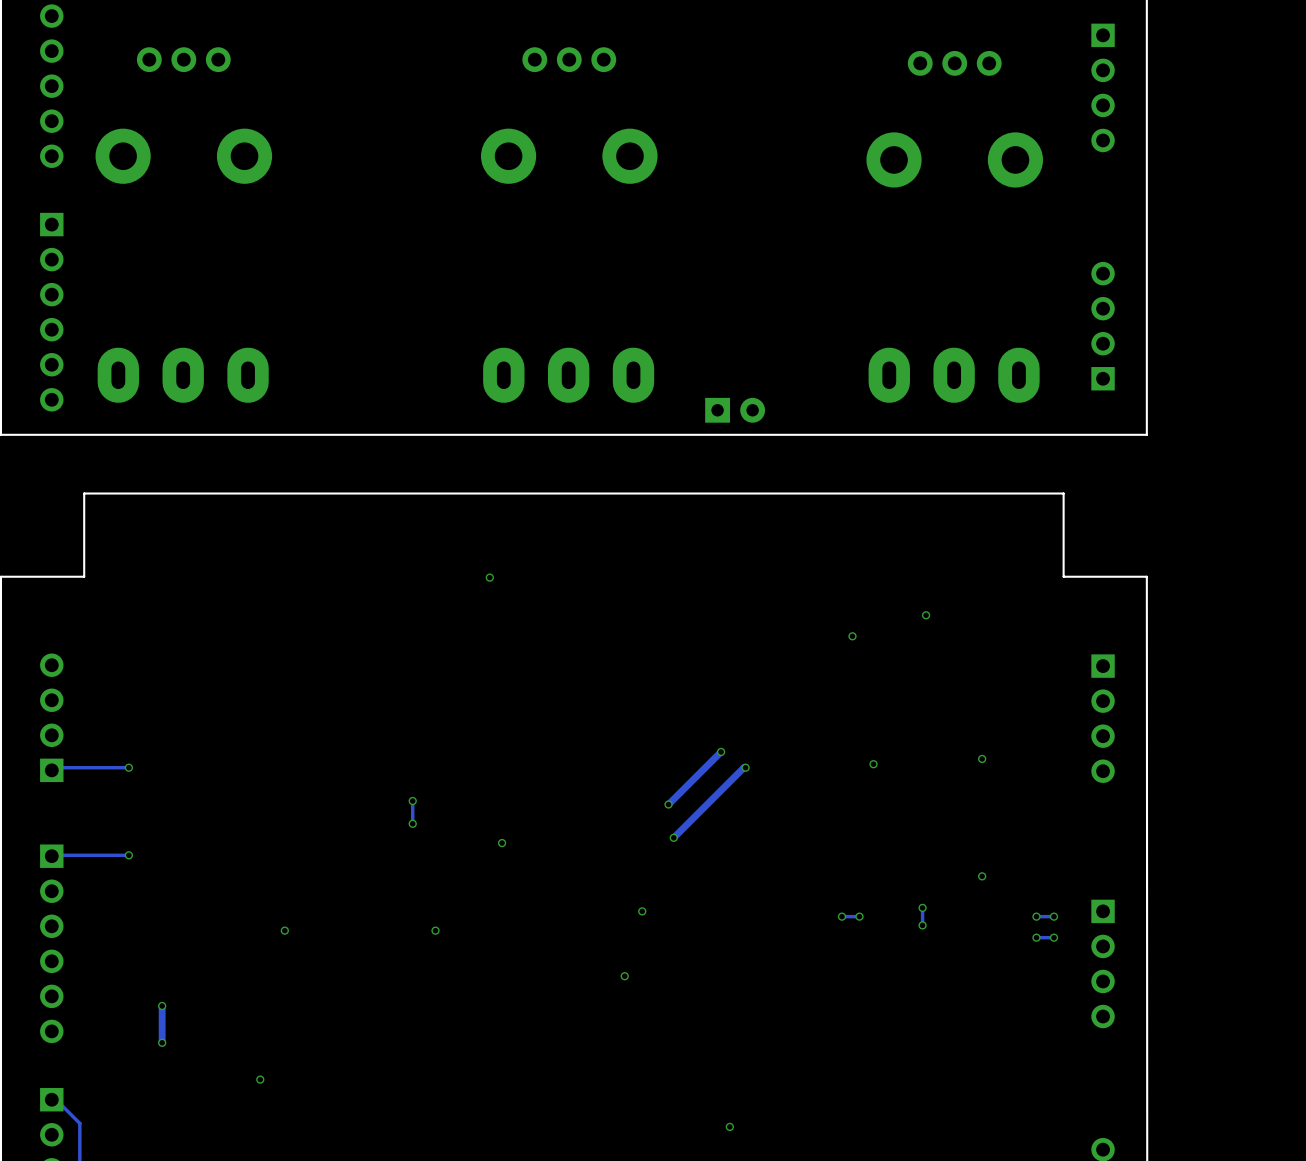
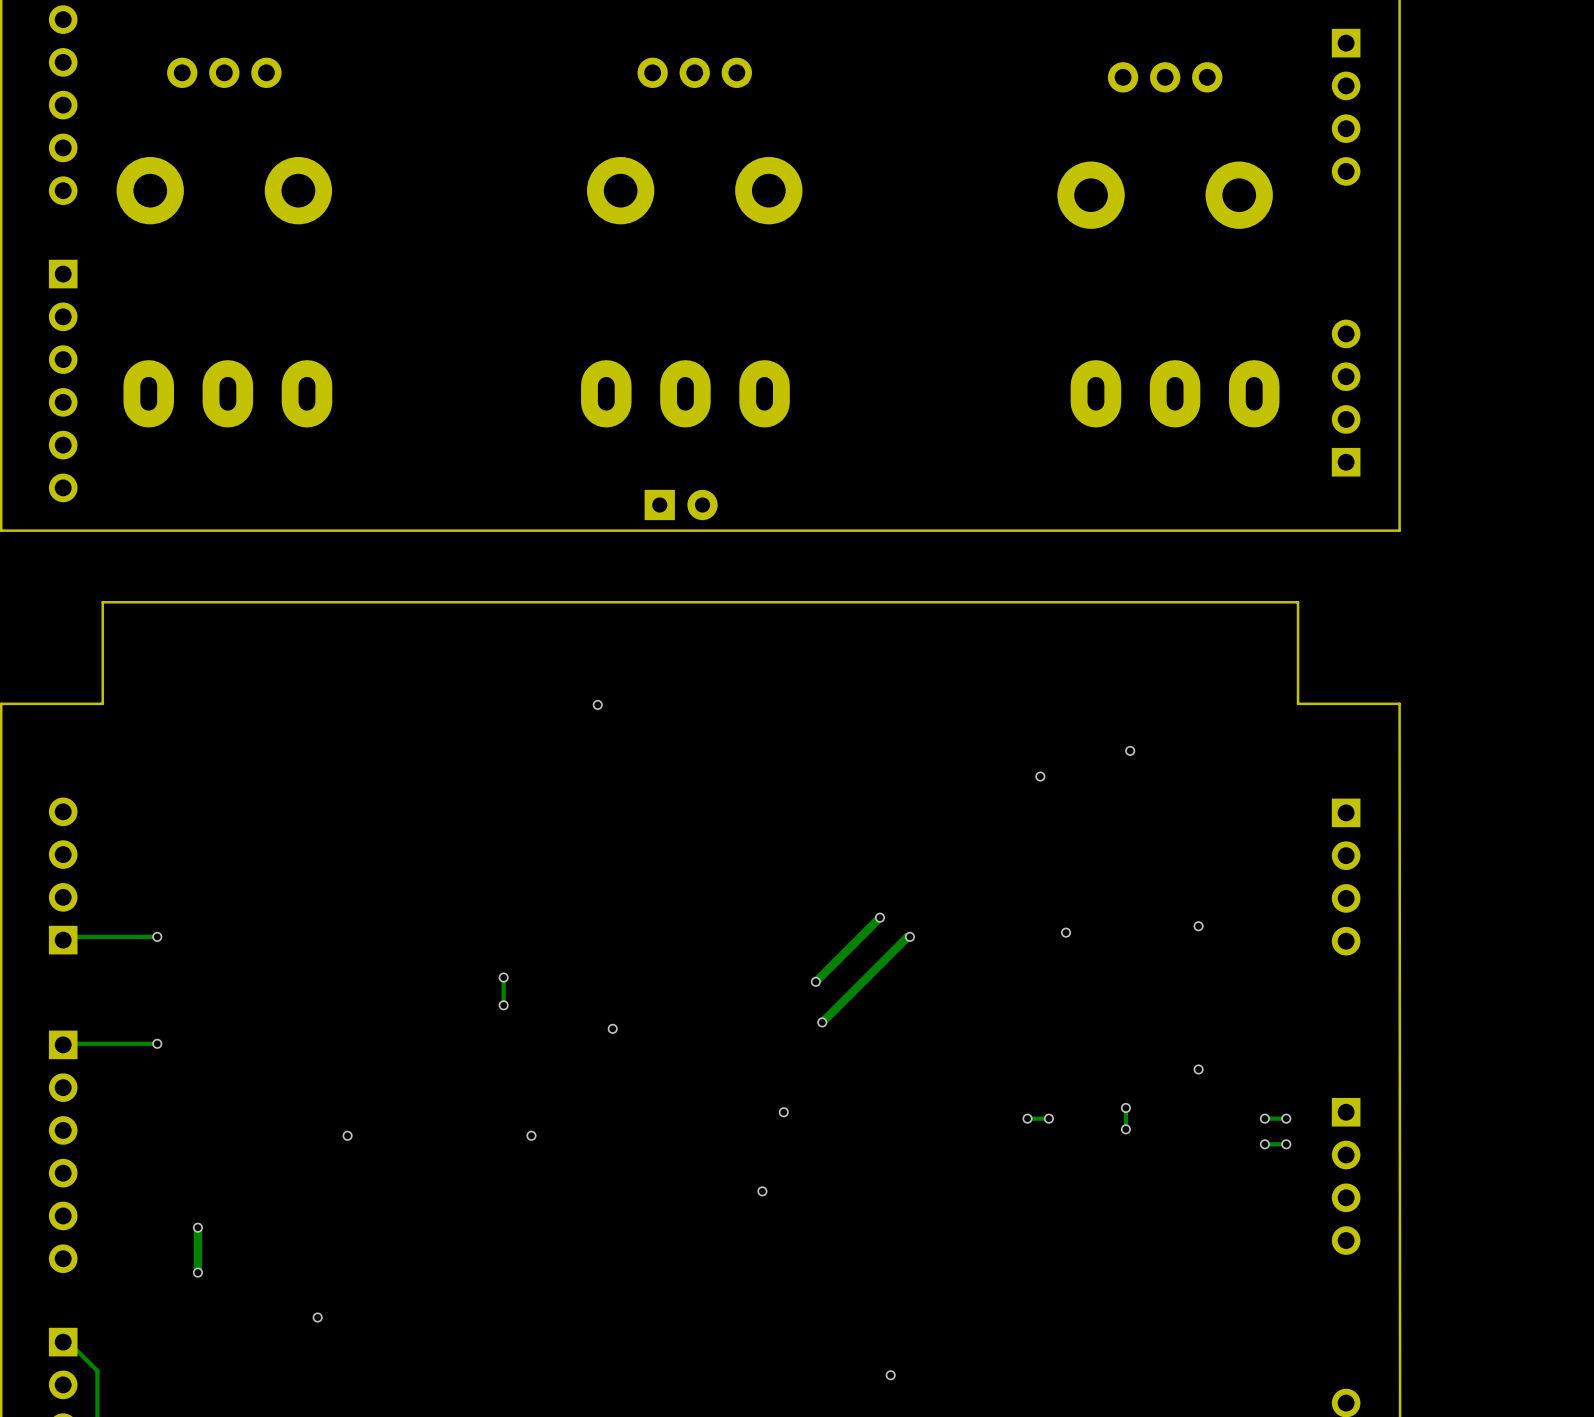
part position: (183, 375) -> (227, 393)
part position: (568, 375) -> (685, 393)
part position: (954, 375) -> (1175, 393)
part position: (735, 410) -> (681, 504)

